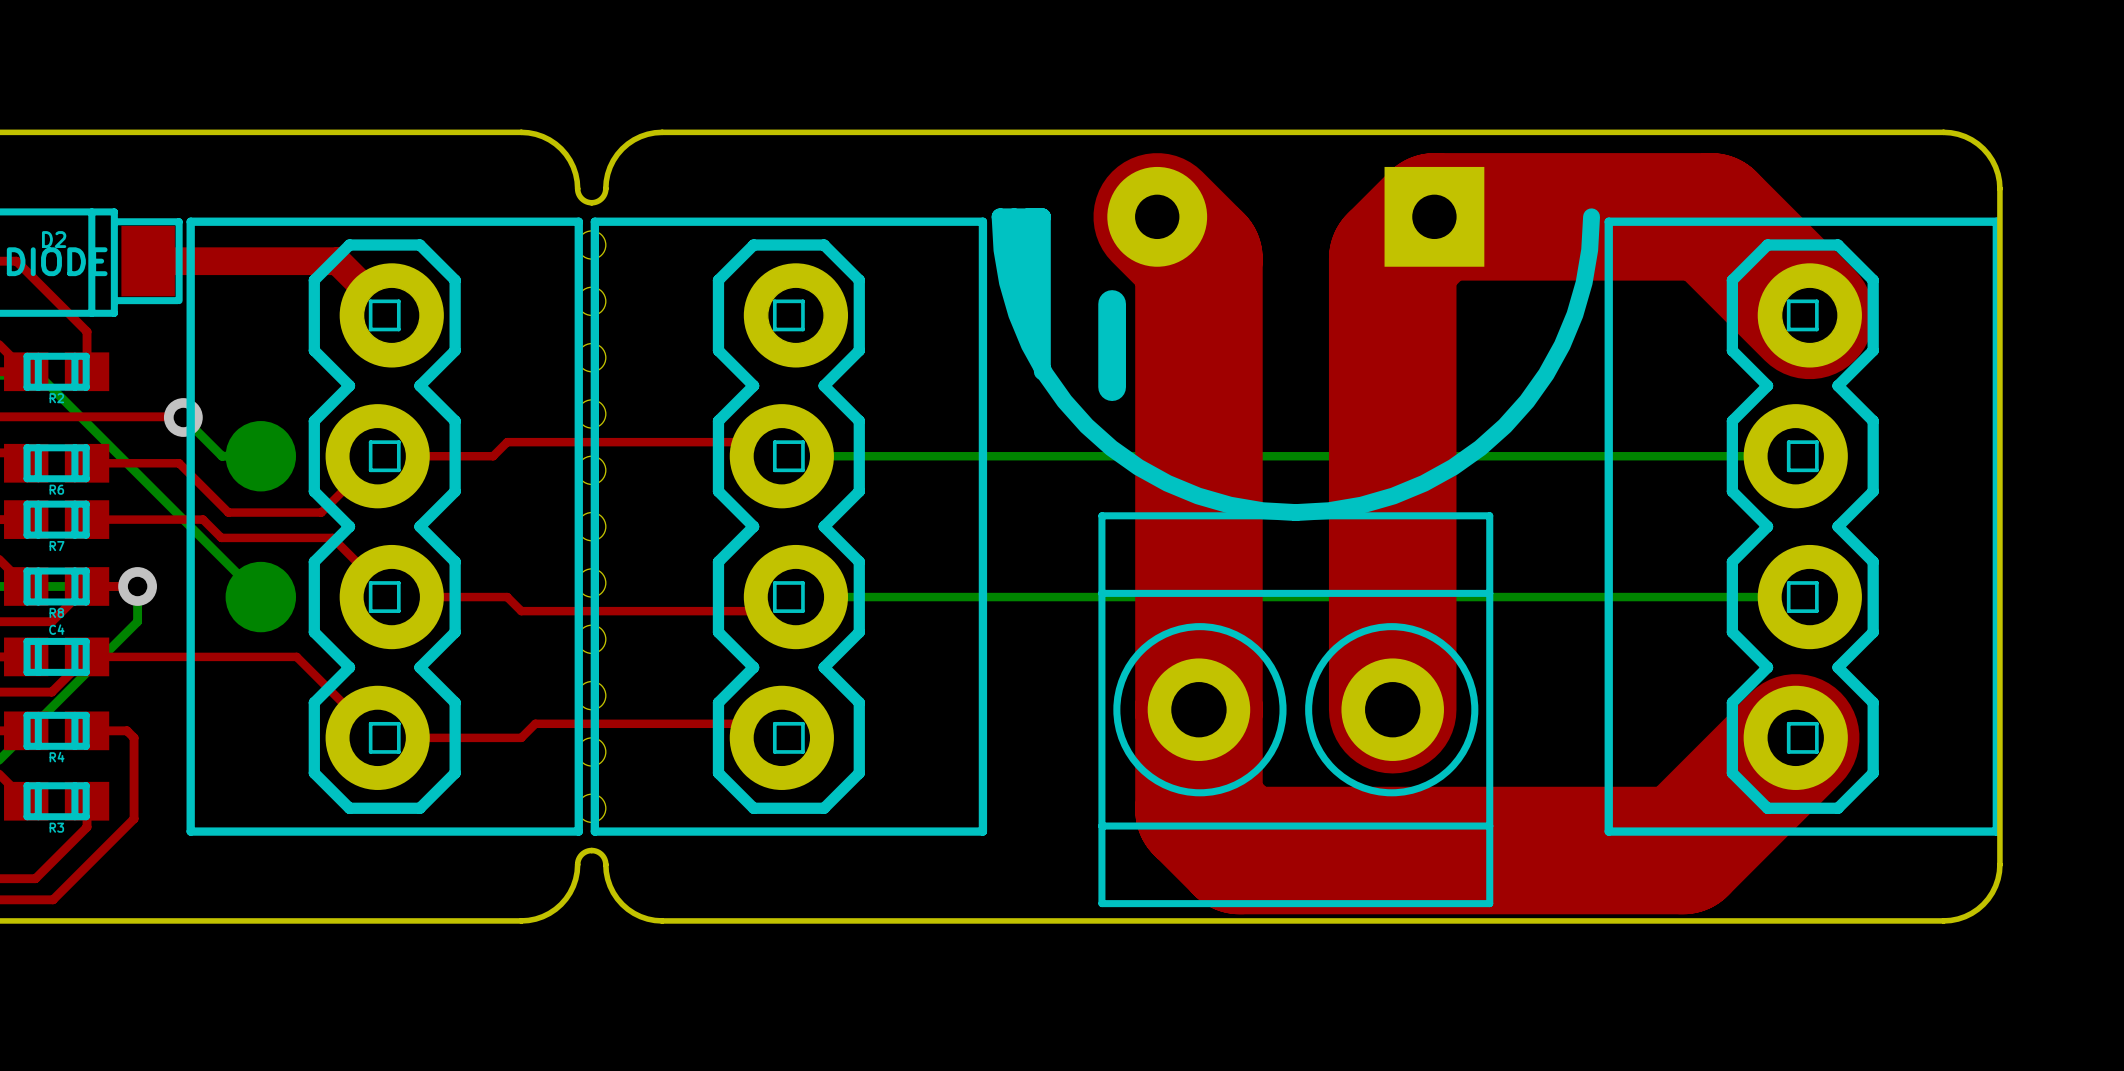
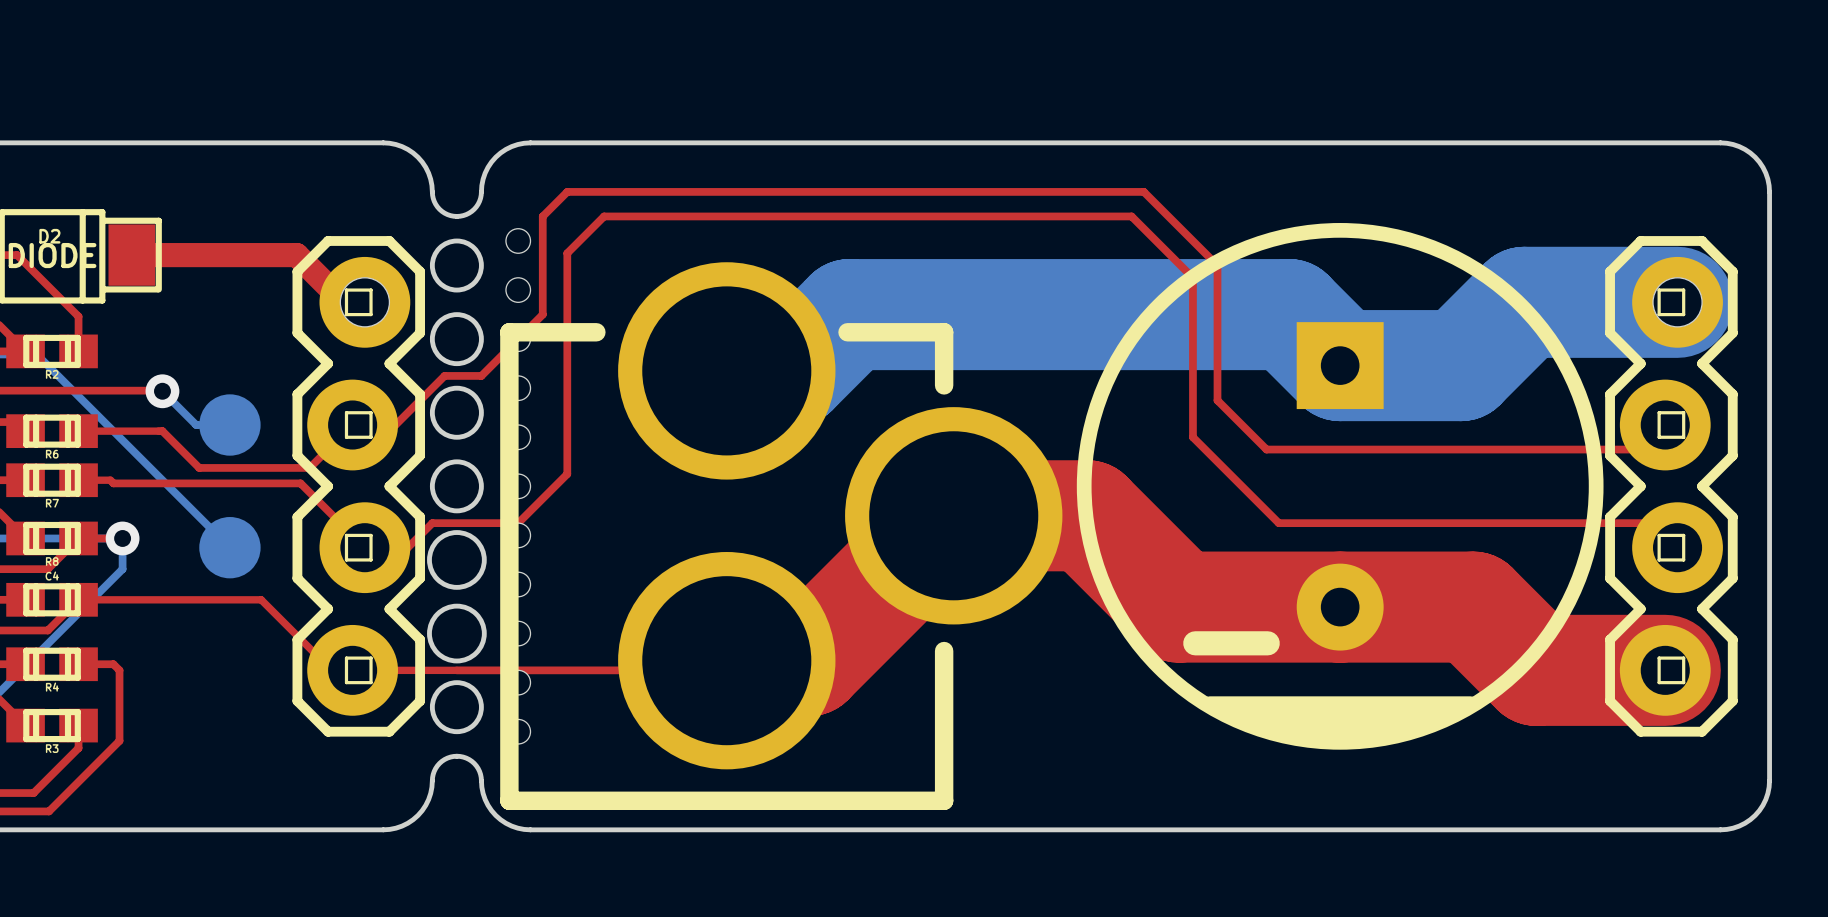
board edge: (436, 132) (521, 132) (542, 136) (555, 143) (566, 154) (575, 174) (579, 195) (584, 200) (591, 202) (598, 200) (603, 195) (610, 167) (622, 148) (640, 136) (662, 132) -> (383, 142) (402, 146) (417, 157) (428, 173) (435, 204) (444, 213) (456, 216) (469, 213) (476, 206) (480, 198) (483, 179) (488, 167) (495, 157) (505, 149) (524, 143) (579, 142)
board edge: (1943, 132) (1965, 136) (1983, 148) (1995, 167) (1999, 188) (1999, 871) (1992, 892) (1977, 909) (1958, 919) (1943, 920) -> (1695, 142) (1726, 143) (1745, 149) (1755, 157) (1762, 167) (1769, 185) (1769, 780) (1767, 793) (1762, 805) (1755, 815) (1745, 823) (1726, 829) (1695, 829)
top track: (1157, 216) (1198, 258) (1198, 809) (1239, 850) (1683, 850) (1795, 737) -> none
part footprint: [186, 217, 583, 836] -> [292, 236, 425, 737]
round board edge: none -> [429, 238, 484, 293]
top track: (1809, 315) (1711, 216) (1434, 216) (1392, 258) (1392, 709) -> none
bottom track: none -> (1677, 302) (1524, 302) (1460, 365) (1340, 365) (1289, 314) (849, 314) (793, 370) (726, 370)
round board edge: none -> [429, 312, 484, 367]
part: (1295, 343) -> none
round board edge: none -> [429, 385, 484, 440]
top track: (401, 456) (377, 456) (321, 512) (228, 512) (179, 463) -> (352, 425) (309, 467) (199, 467) (162, 431) (158, 431)
top track: (450, 456) (493, 456) (507, 442) (767, 442) (781, 456) -> (395, 425) (444, 375) (481, 375) (542, 314) (542, 216) (567, 191) (1143, 191) (1217, 265) (1217, 400) (1266, 449) (1640, 449) (1665, 425)
bottom track: (781, 456) (1795, 456) -> none
round board edge: none -> [429, 459, 484, 514]
top track: (123, 519) (203, 519) (221, 537) (332, 537) (391, 597) (415, 597) -> (110, 480) (113, 483) (300, 483) (364, 547)
part: (788, 526) -> none
part: none -> (1340, 486)
part: (1802, 526) -> none
part: none -> (1671, 486)
round board edge: none -> [427, 530, 487, 590]
part: none -> (781, 536)
top track: (464, 597) (507, 597) (521, 611) (781, 611) (795, 597) -> (407, 547) (432, 523) (518, 523) (567, 474) (567, 253) (604, 216) (1131, 216) (1192, 277) (1192, 437) (1278, 523) (1653, 523) (1677, 547)
bottom track: (795, 597) (1809, 597) -> none
round board edge: none -> [427, 603, 487, 664]
part: (1295, 709) -> none
top track: (521, 737) (535, 723) (767, 723) (781, 737) -> (456, 670) (717, 670) (726, 660) (808, 660) (953, 515) (1087, 515) (1178, 607) (1473, 607) (1536, 670) (1665, 670)
round board edge: none -> [429, 680, 484, 735]
board edge: (436, 920) (521, 920) (542, 916) (555, 909) (566, 898) (575, 879) (579, 857) (584, 852) (591, 850) (598, 852) (603, 857) (610, 886) (622, 904) (640, 916) (662, 920) -> (383, 829) (402, 826) (417, 815) (428, 799) (435, 768) (444, 759) (456, 756) (466, 758) (476, 765) (480, 774) (483, 793) (488, 805) (495, 815) (505, 823) (524, 829) (579, 829)

